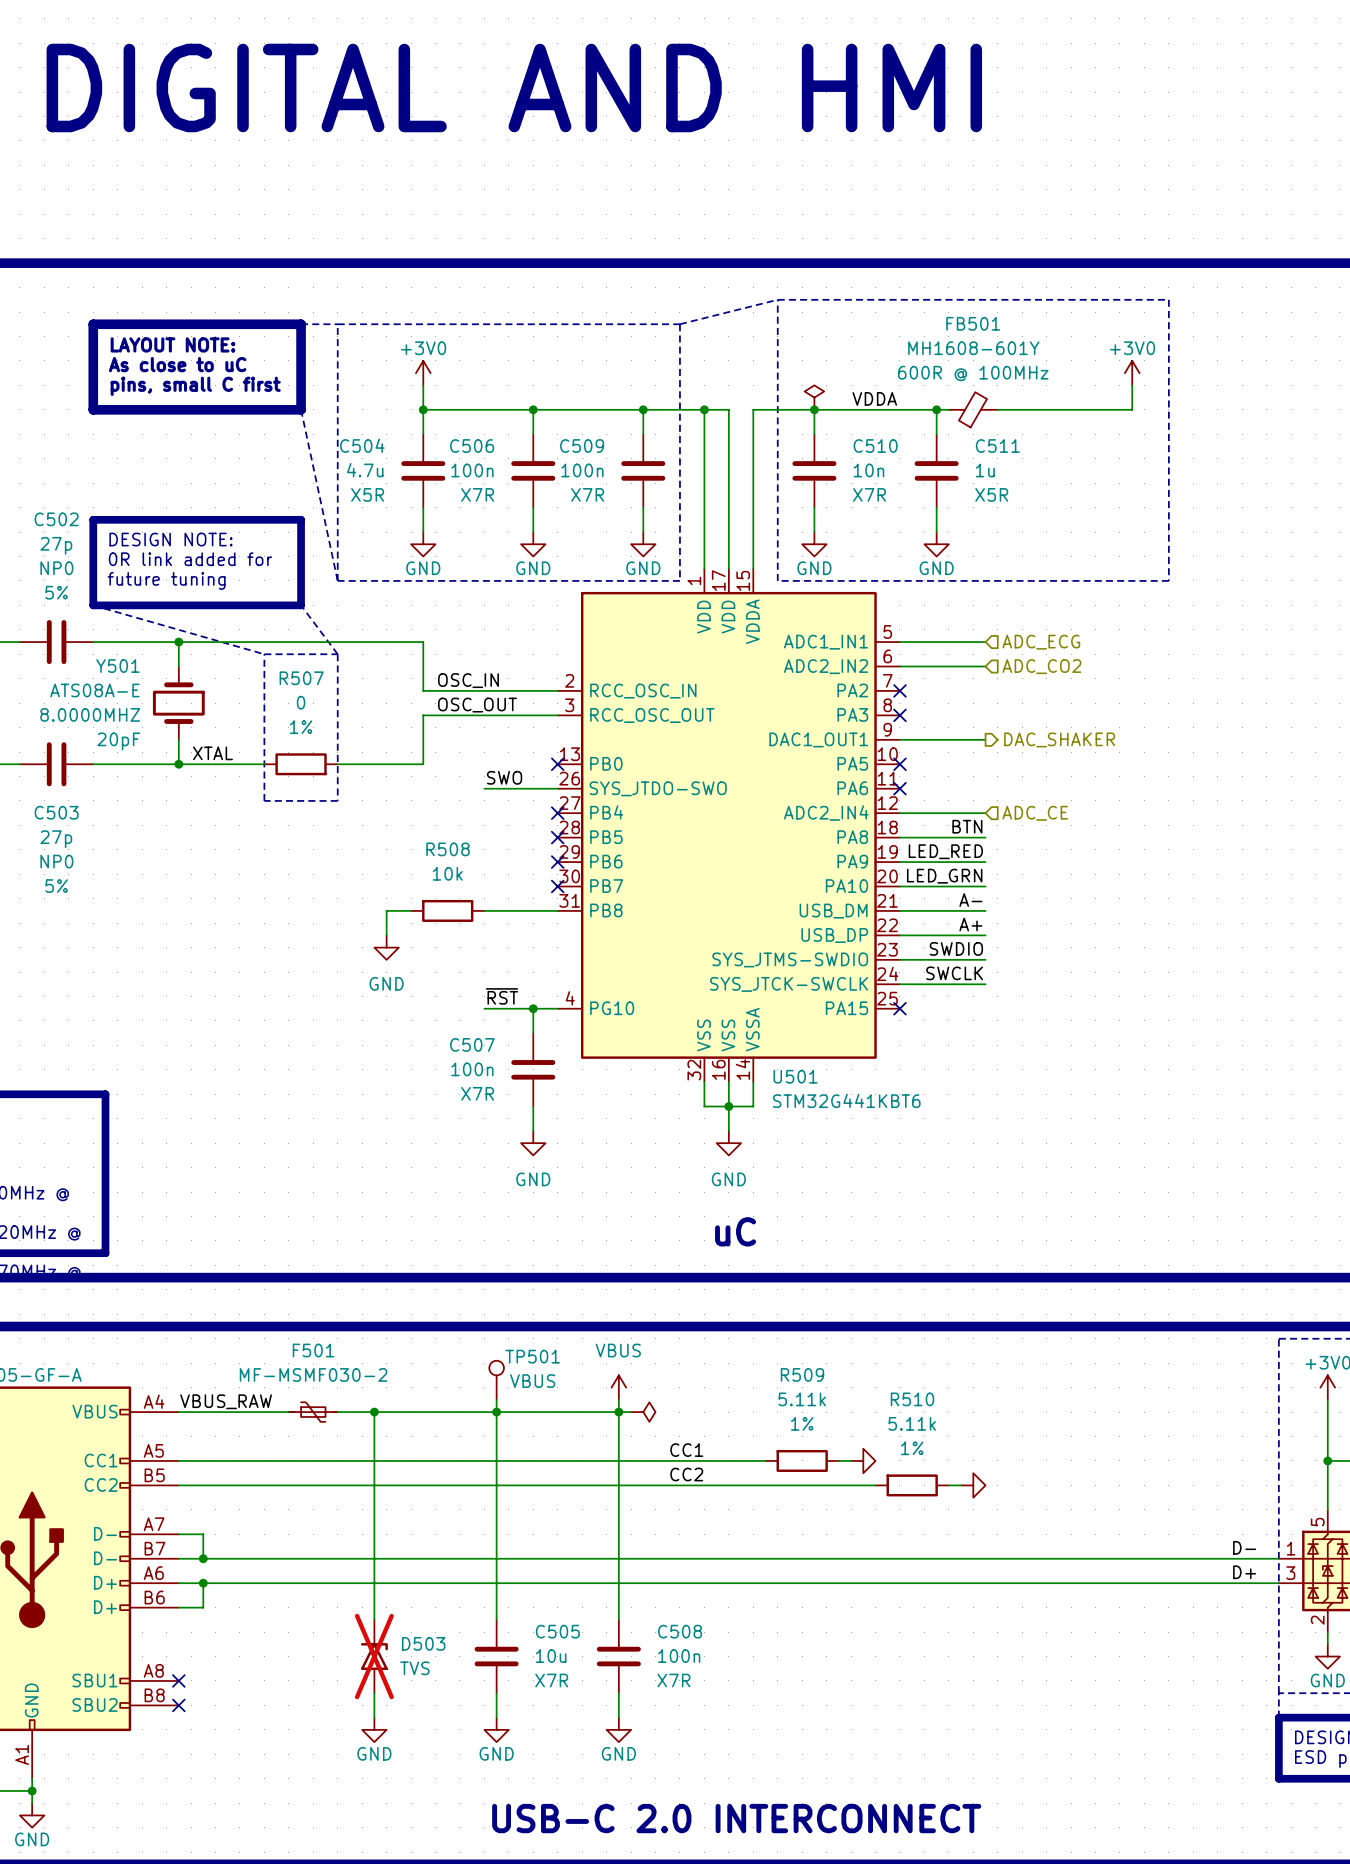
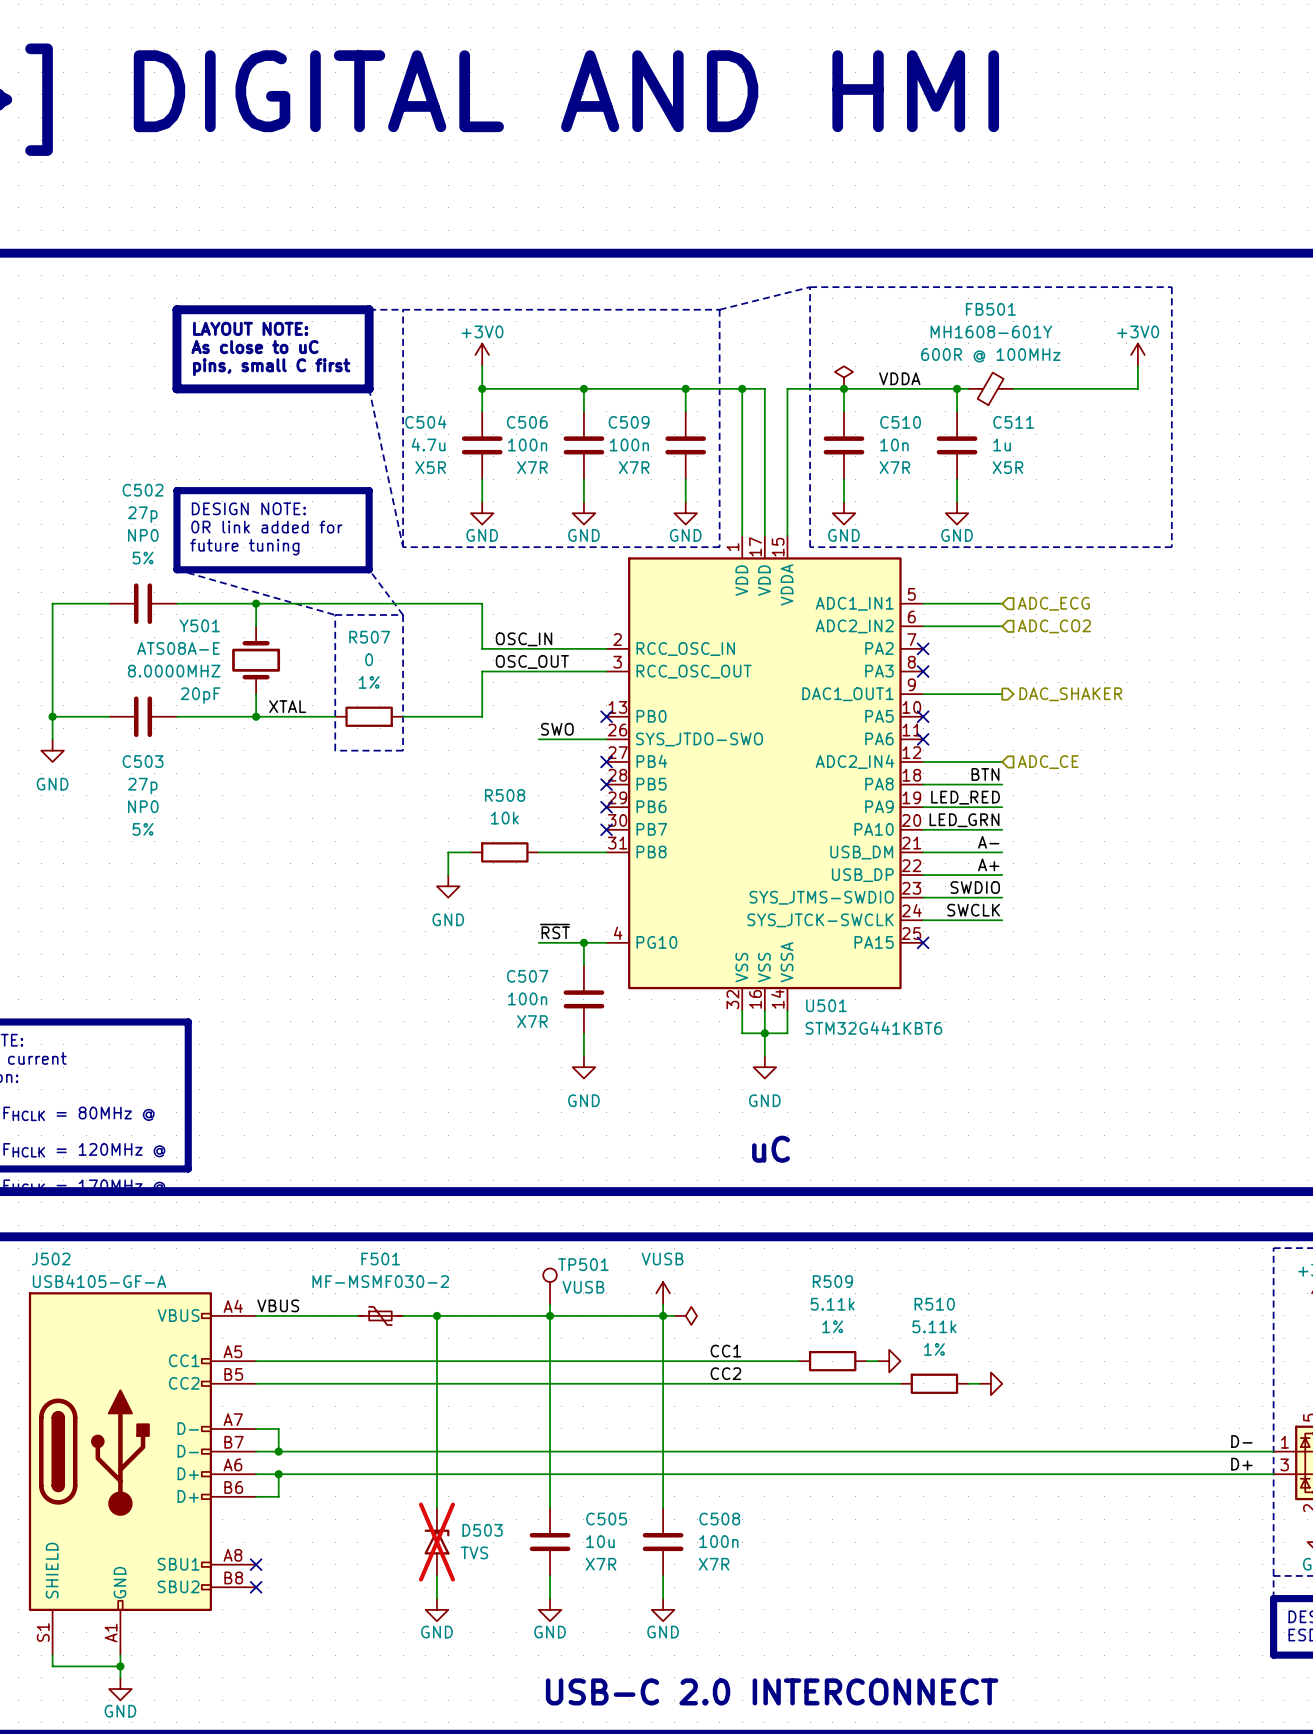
TP501 value: VBUS (532, 1381) -> VUSB (583, 1287)
power symbol: VBUS (618, 1387) -> VUSB (663, 1293)
label: VBUS_RAW (226, 1401) -> VBUS (278, 1305)

